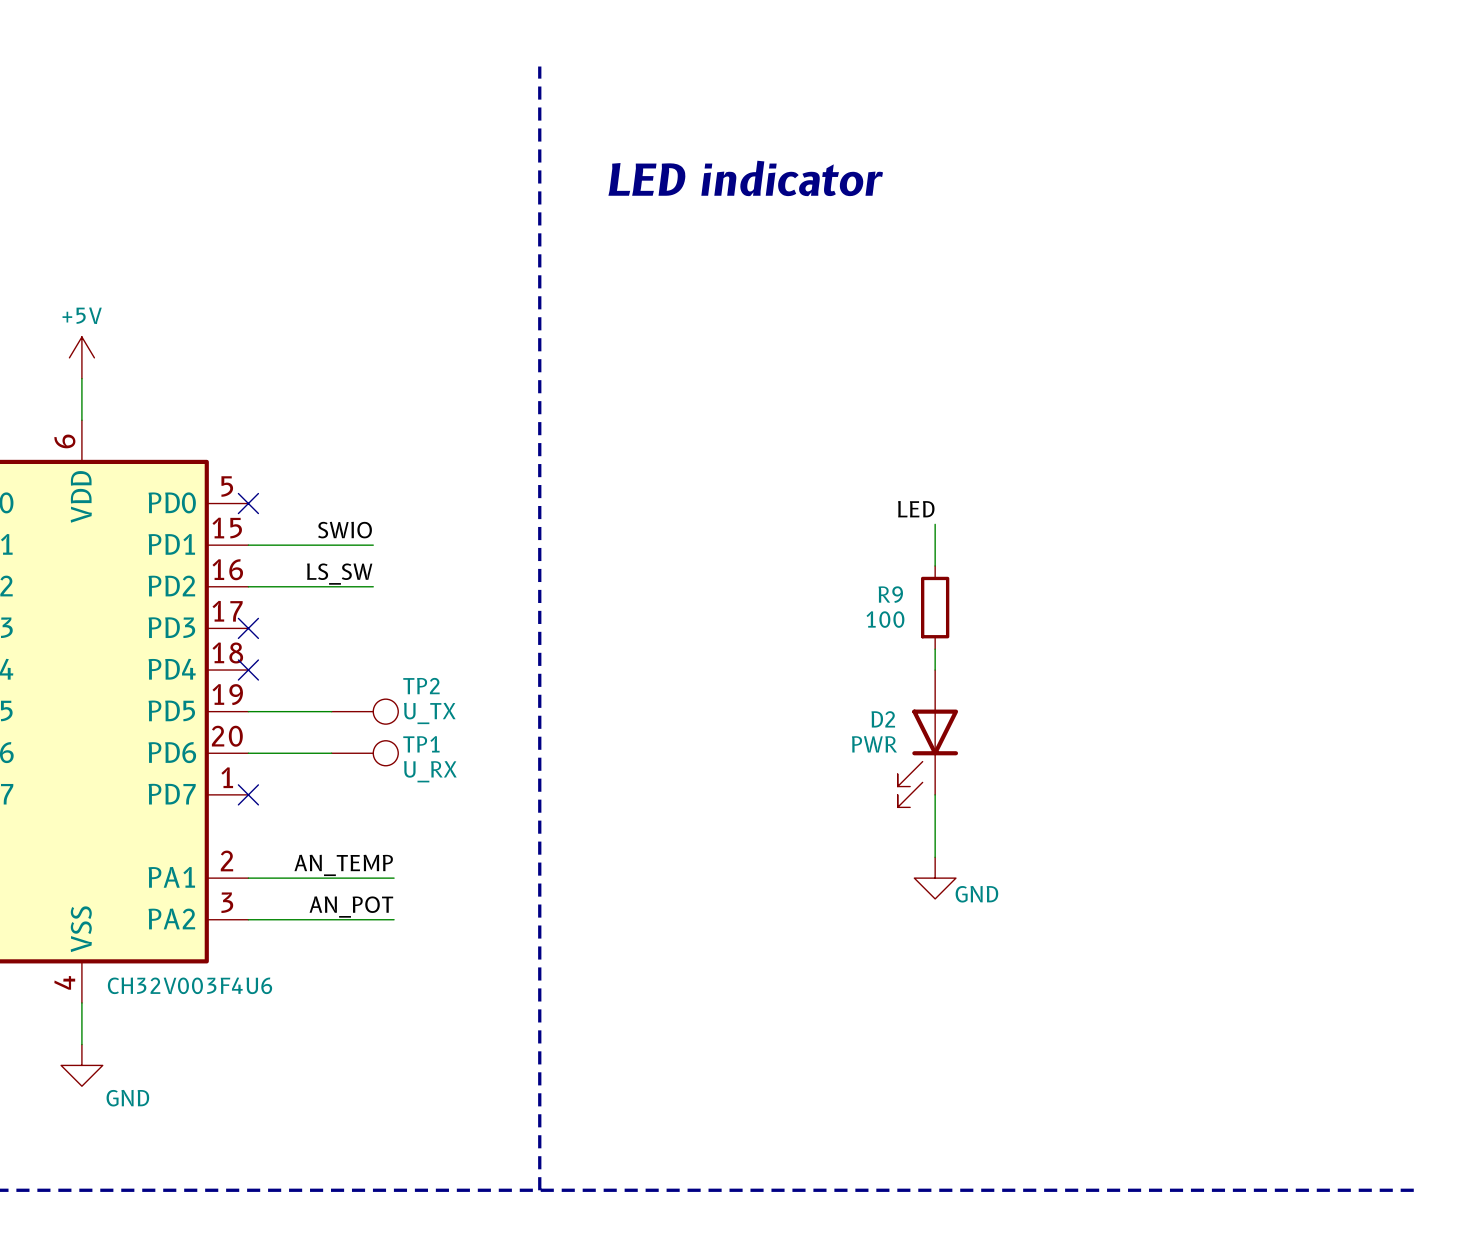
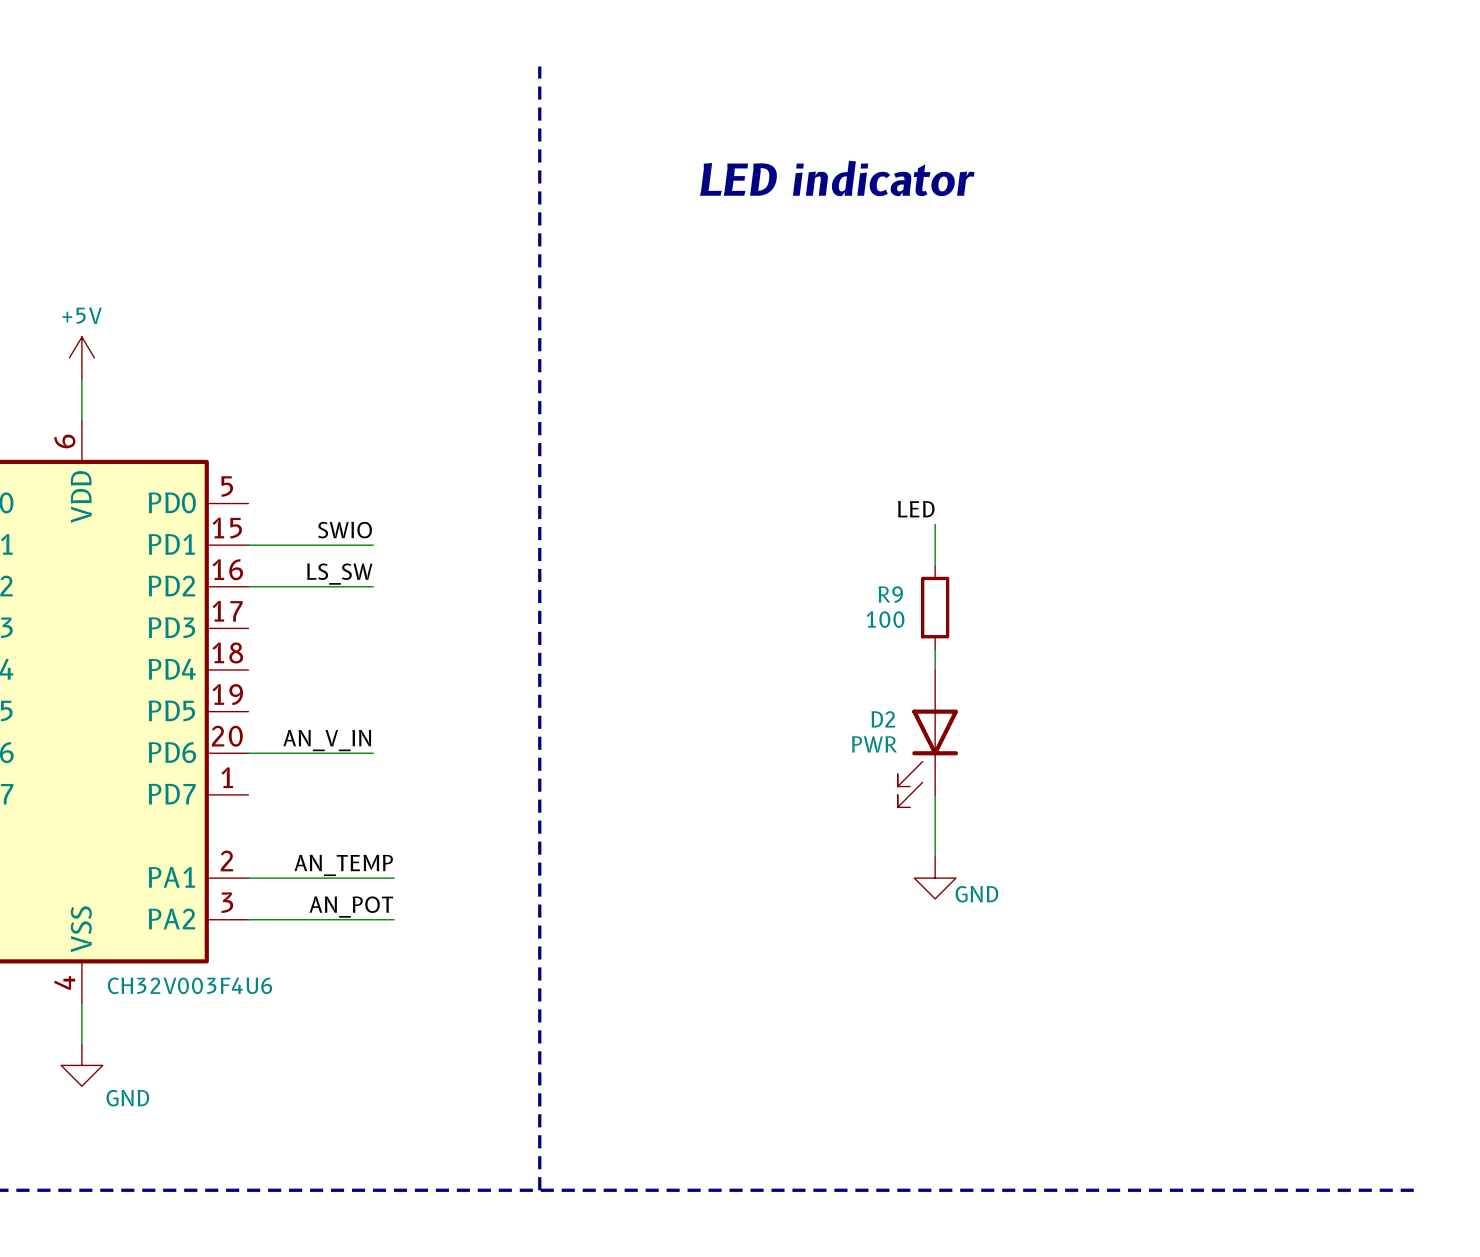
text position: LED indicator (745, 178) -> LED indicator (837, 178)
no-connect mark: (248, 503) -> none
no-connect mark: (248, 628) -> none
no-connect mark: (248, 670) -> none
wire: (248, 711) (331, 711) -> none
TP2: U_TX (364, 711) -> none
label: none -> AN_V_IN (327, 740)
TP1: U_RX (364, 753) -> none
no-connect mark: (248, 794) -> none

